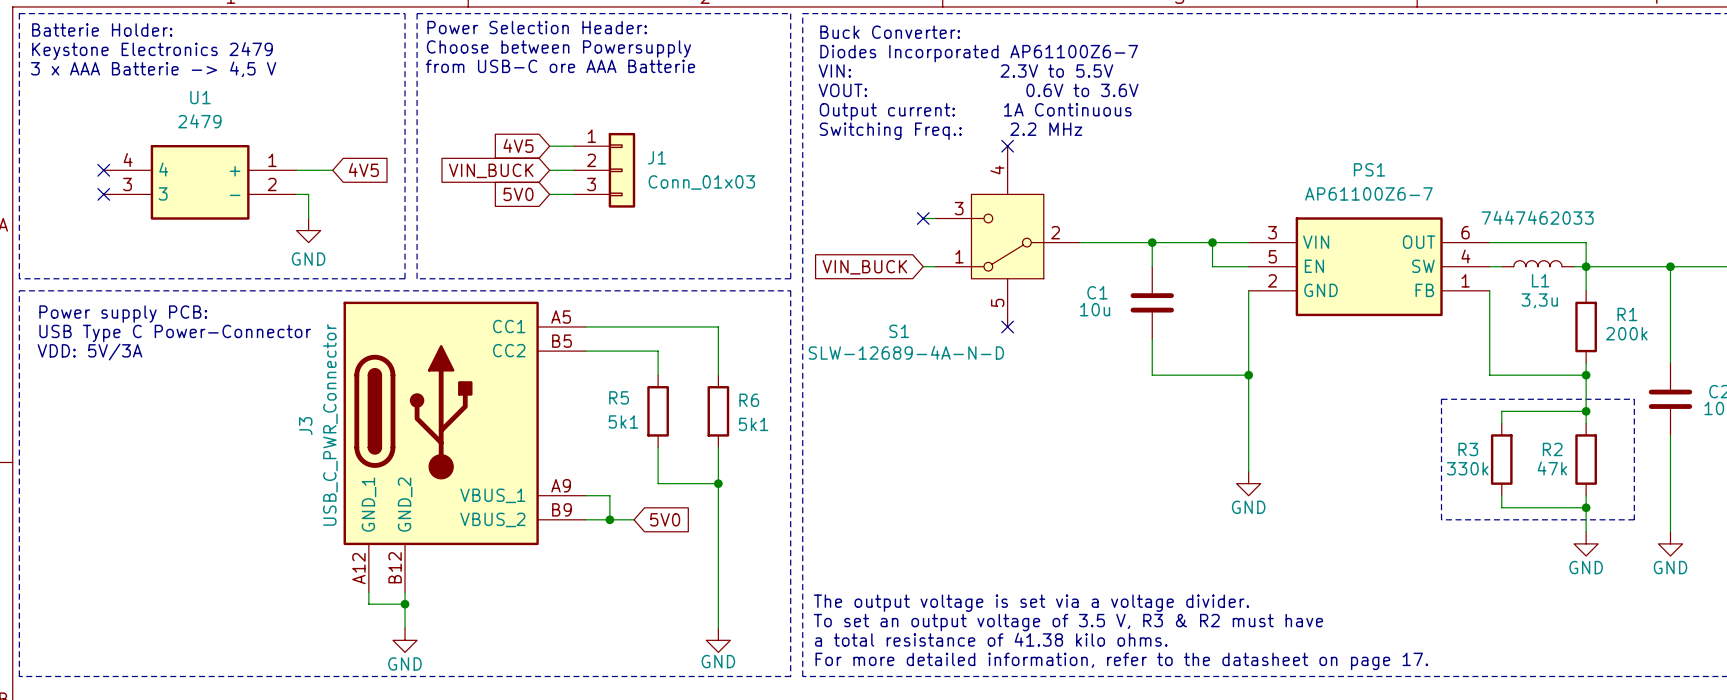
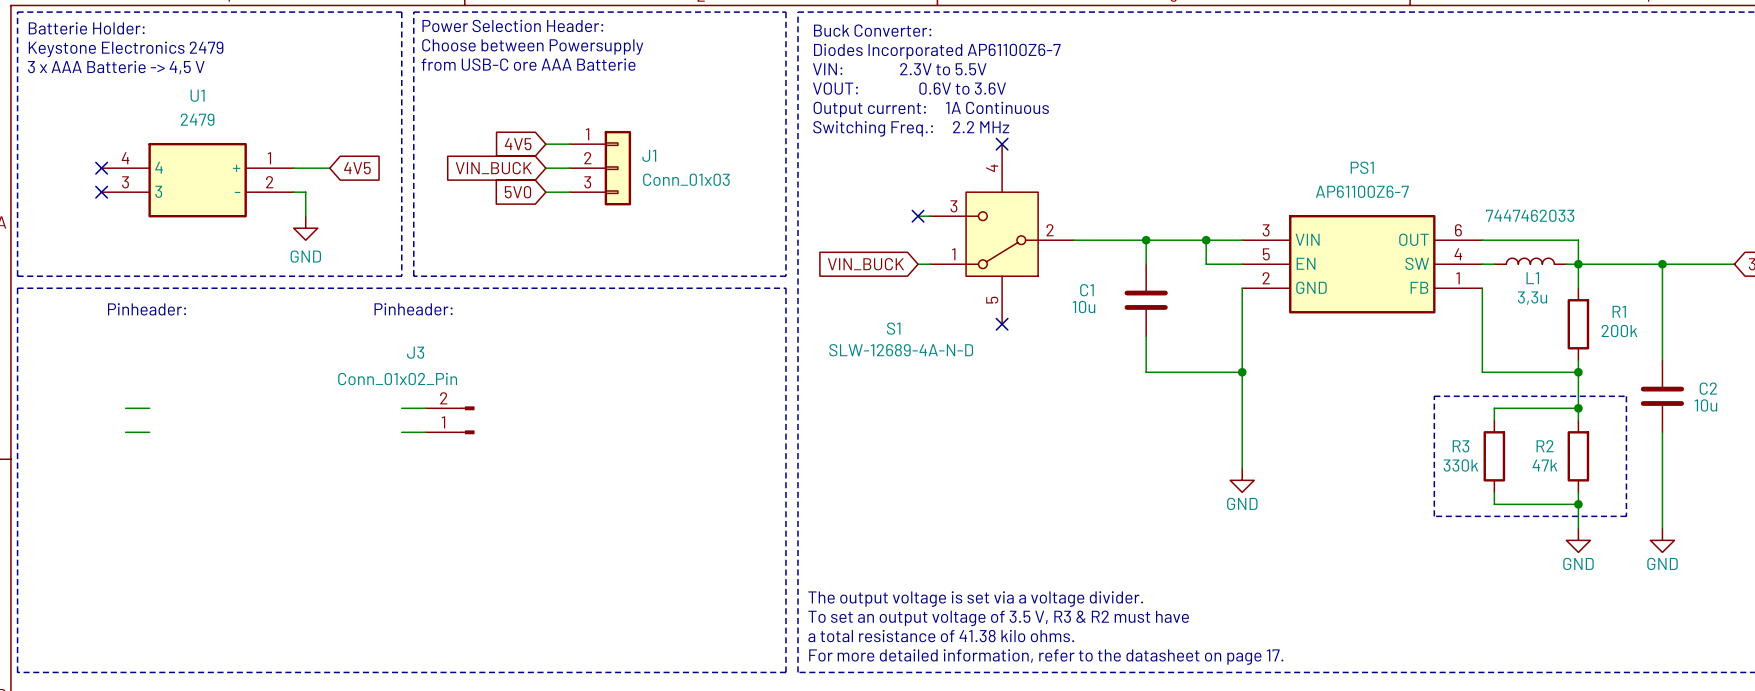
J3 symbol: [343, 301, 586, 593] -> [425, 406, 475, 435]
text: none -> Pinheader: (413, 309)
text: none -> Pinheader: (147, 309)
text: Power supply PCB: (123, 314) -> none
wire: (585, 326) (718, 326) (718, 375) -> none
text: USB Type C Power-Connector (175, 333) -> none
wire: (585, 351) (658, 351) (658, 375) -> none
text: VDD: 5V/3A (89, 352) -> none
wire: none -> (125, 408) (149, 408)
R5: 5k1 (658, 411) -> none
R6: 5k1 (718, 411) -> none
J3 value: USB_C_PWR_Connector (330, 424) -> Conn_01x02_Pin (397, 379)
J3 name position: J3 (305, 426) -> J3 (415, 352)
wire: none -> (125, 432) (149, 432)
wire: (658, 447) (658, 483) (718, 483) -> none
wire: (718, 447) (718, 628) -> none
junction: (718, 483) -> none
wire: (585, 495) (609, 495) (609, 519) -> none
wire: (585, 519) (634, 519) -> none
junction: (609, 519) -> none
global label: 5V0 (665, 519) -> none
wire: (368, 592) (368, 604) (405, 604) -> none
wire: (405, 592) (405, 628) -> none
junction: (405, 604) -> none
power symbol: GND (405, 640) -> none
power symbol: GND (718, 640) -> none

